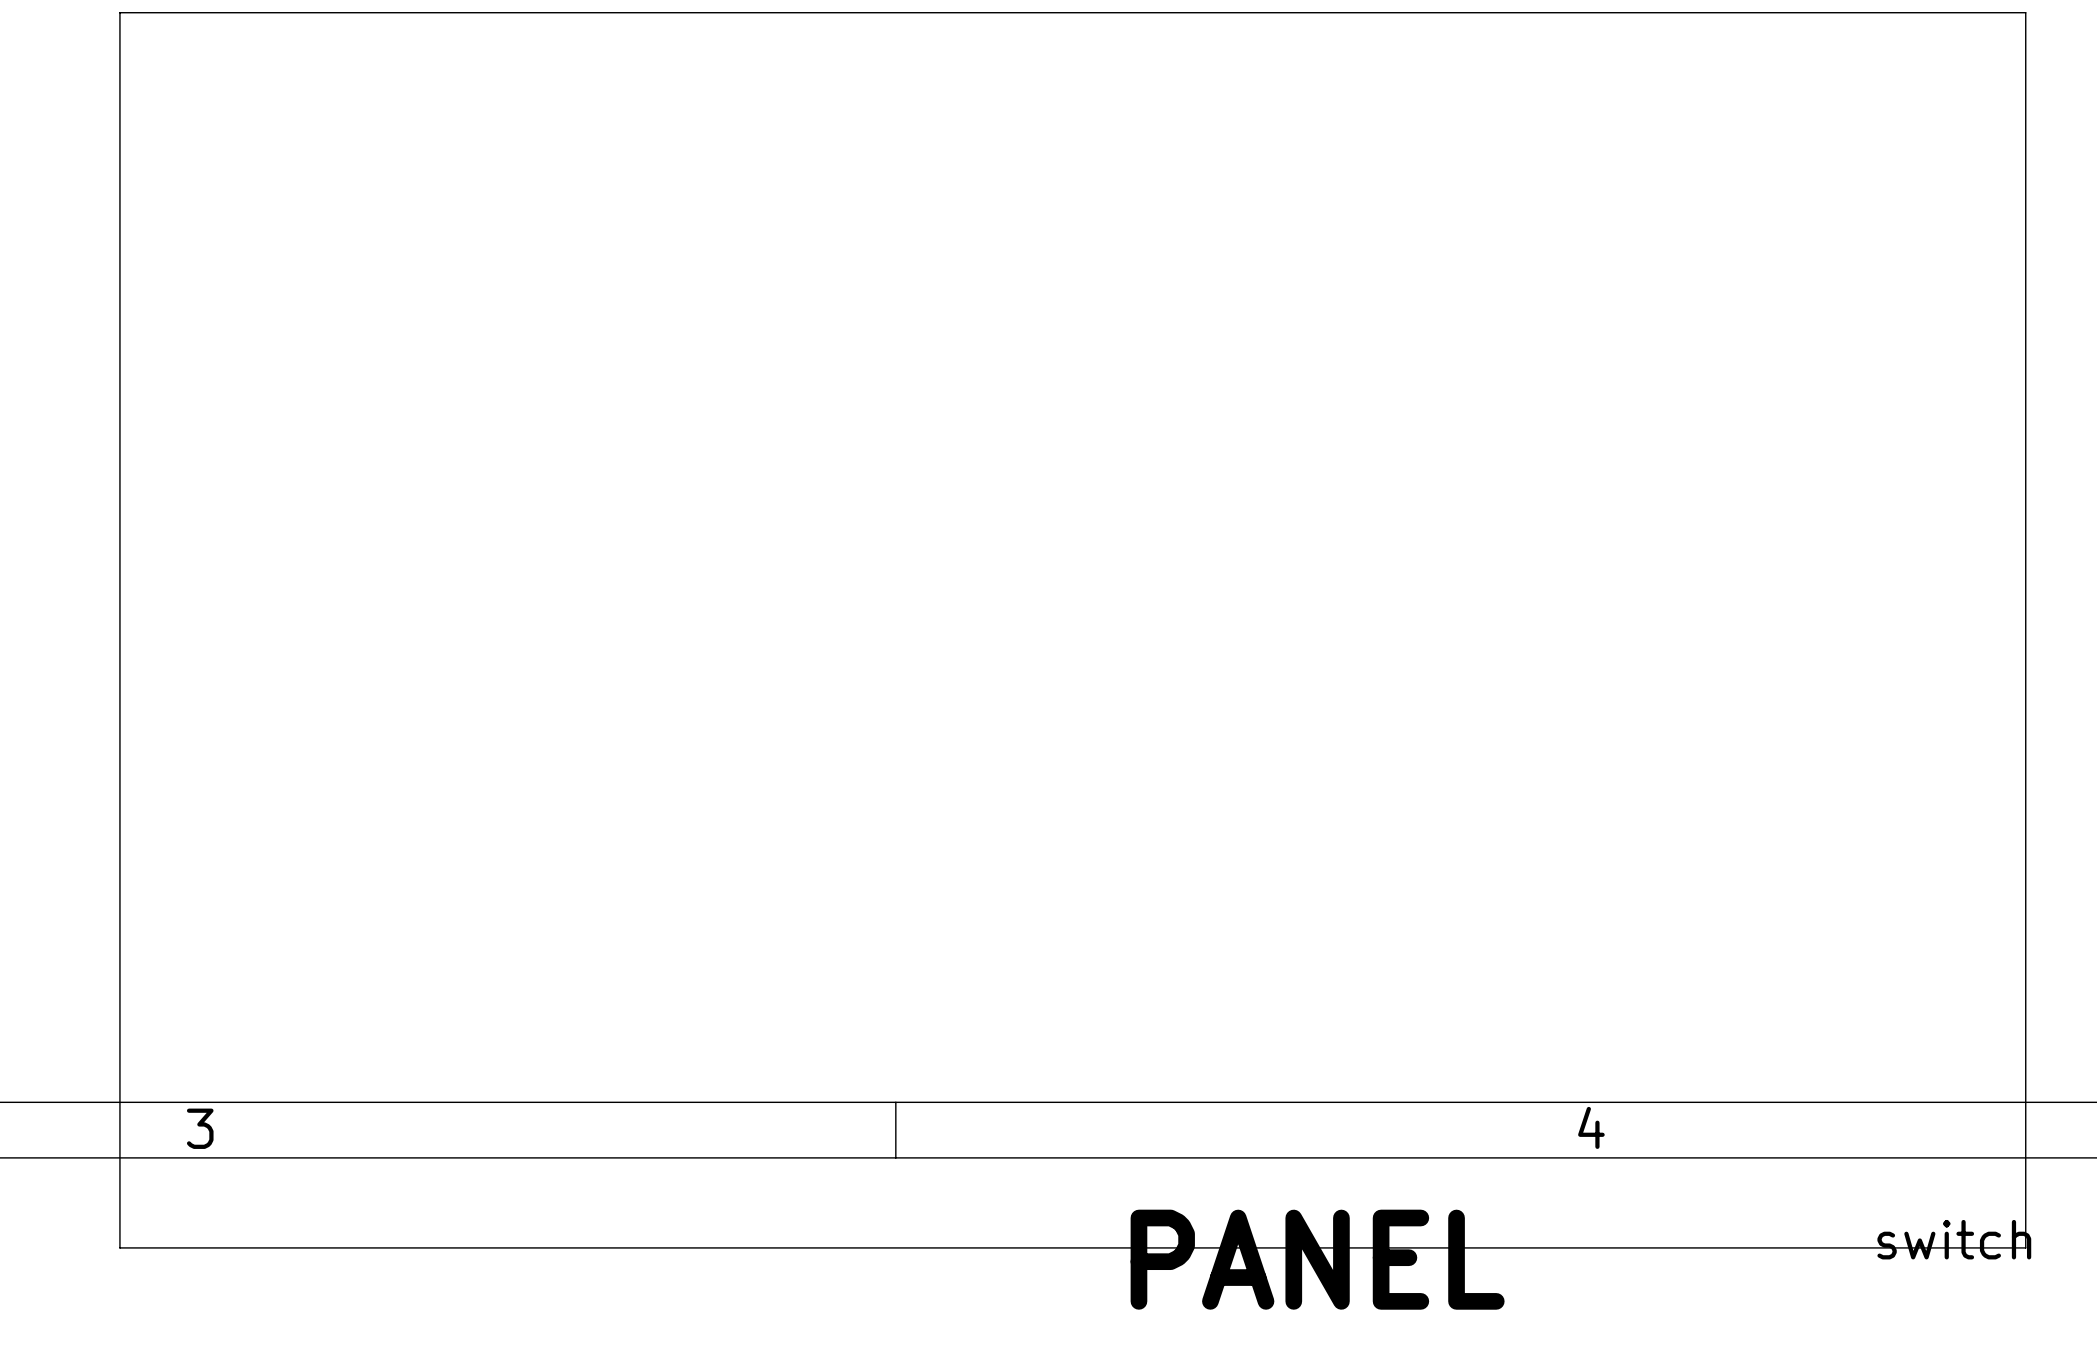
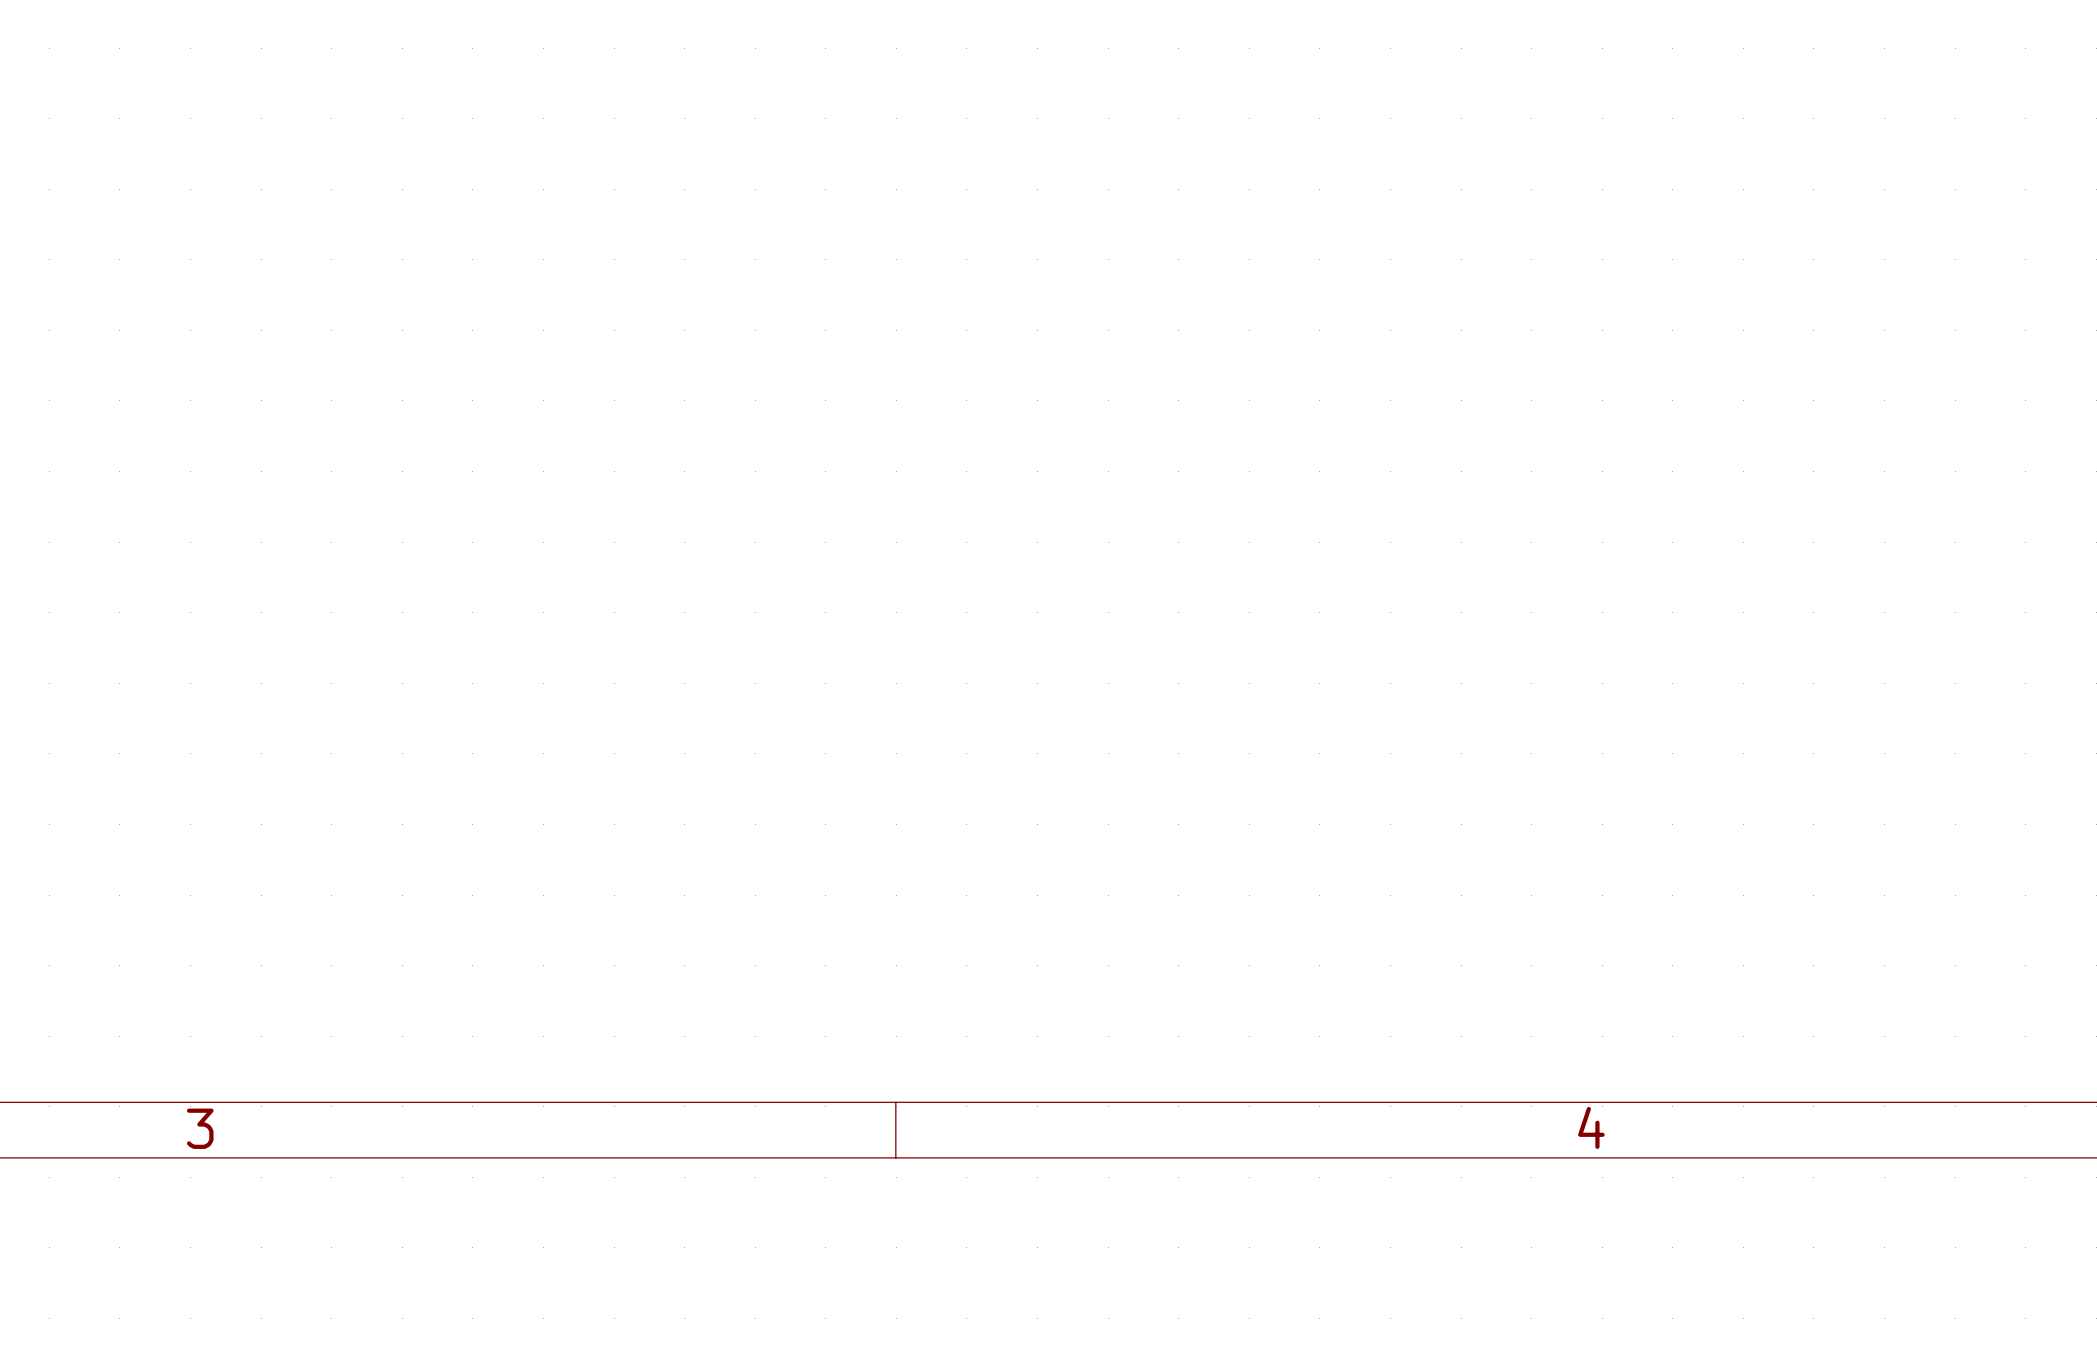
line: (119, 12) (2025, 12) (2025, 1247) (119, 1247) (119, 12) -> none
text: switch (1954, 1239) -> none
text: PANEL (1317, 1259) -> none

